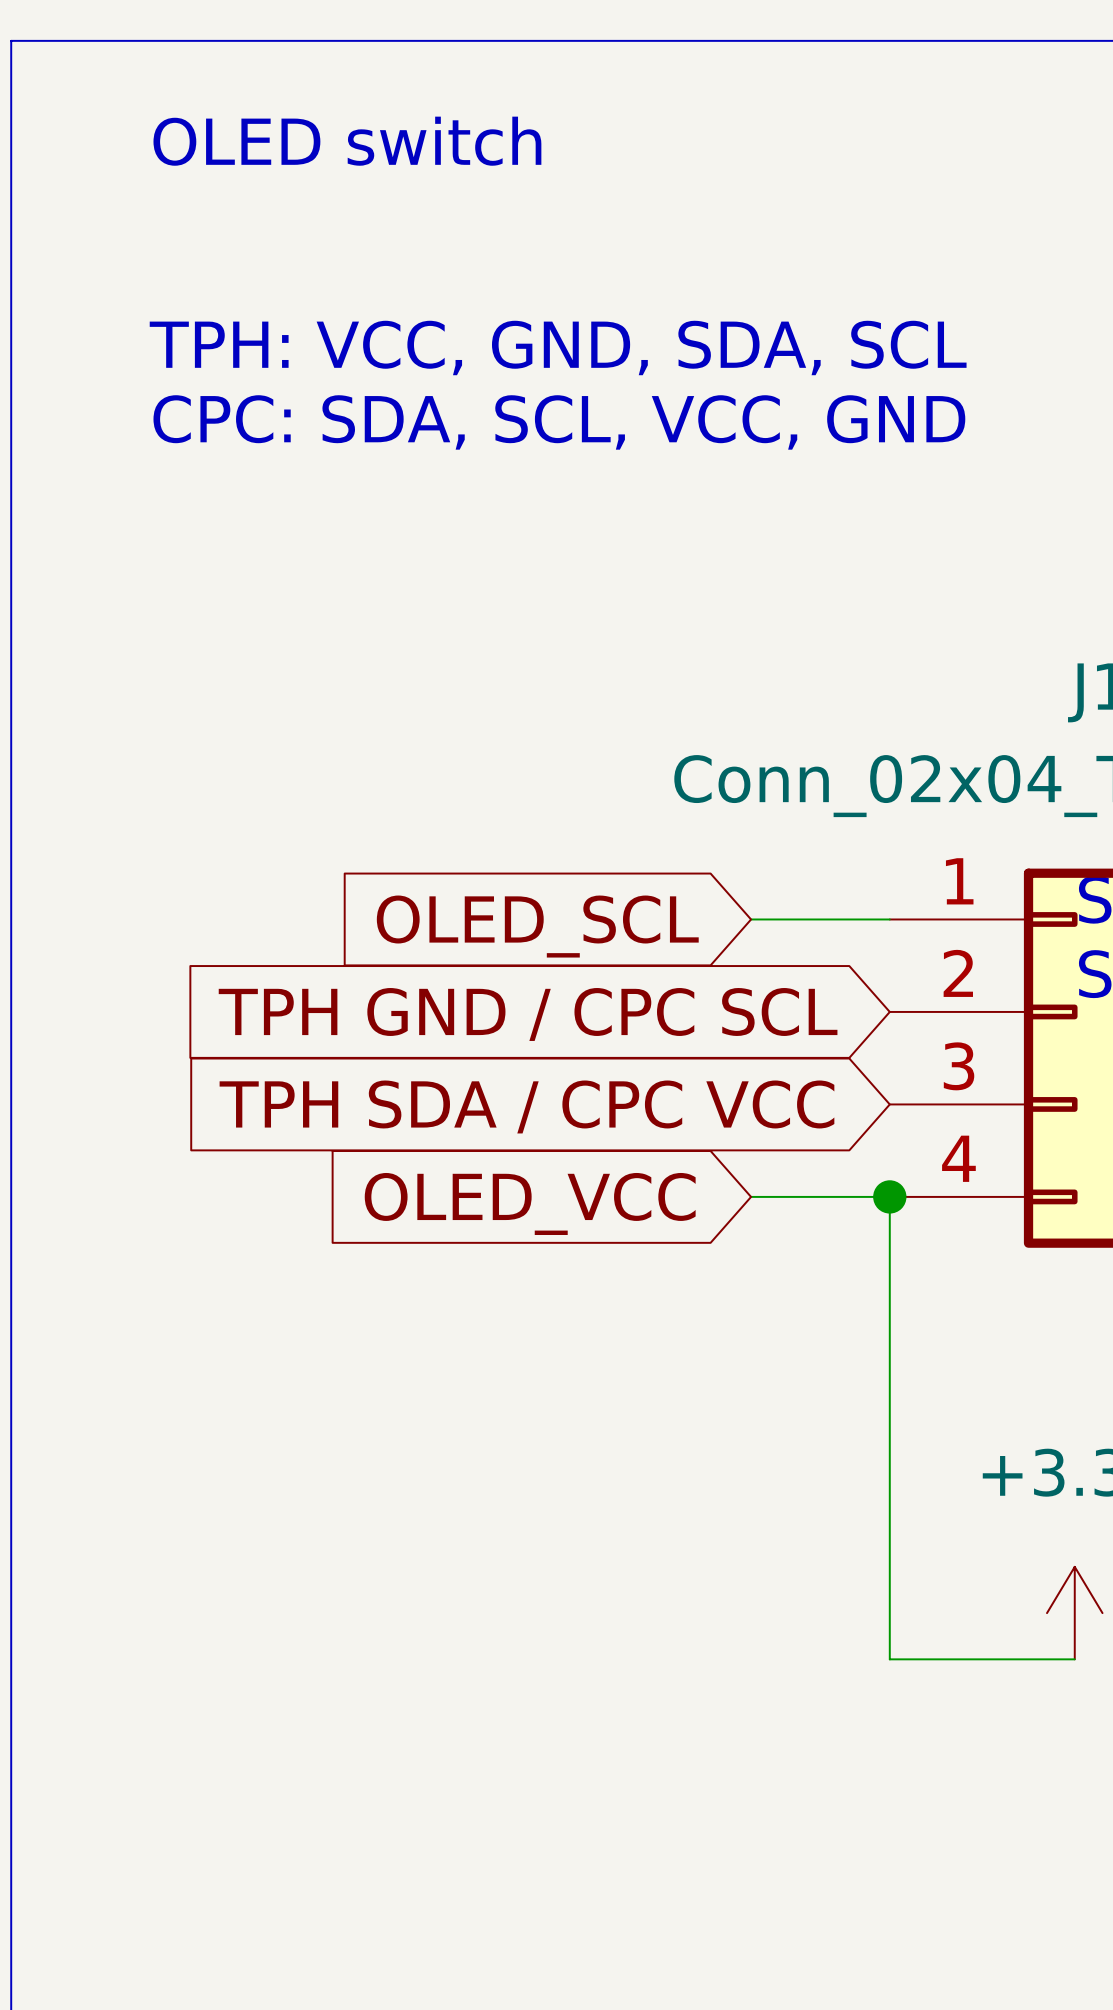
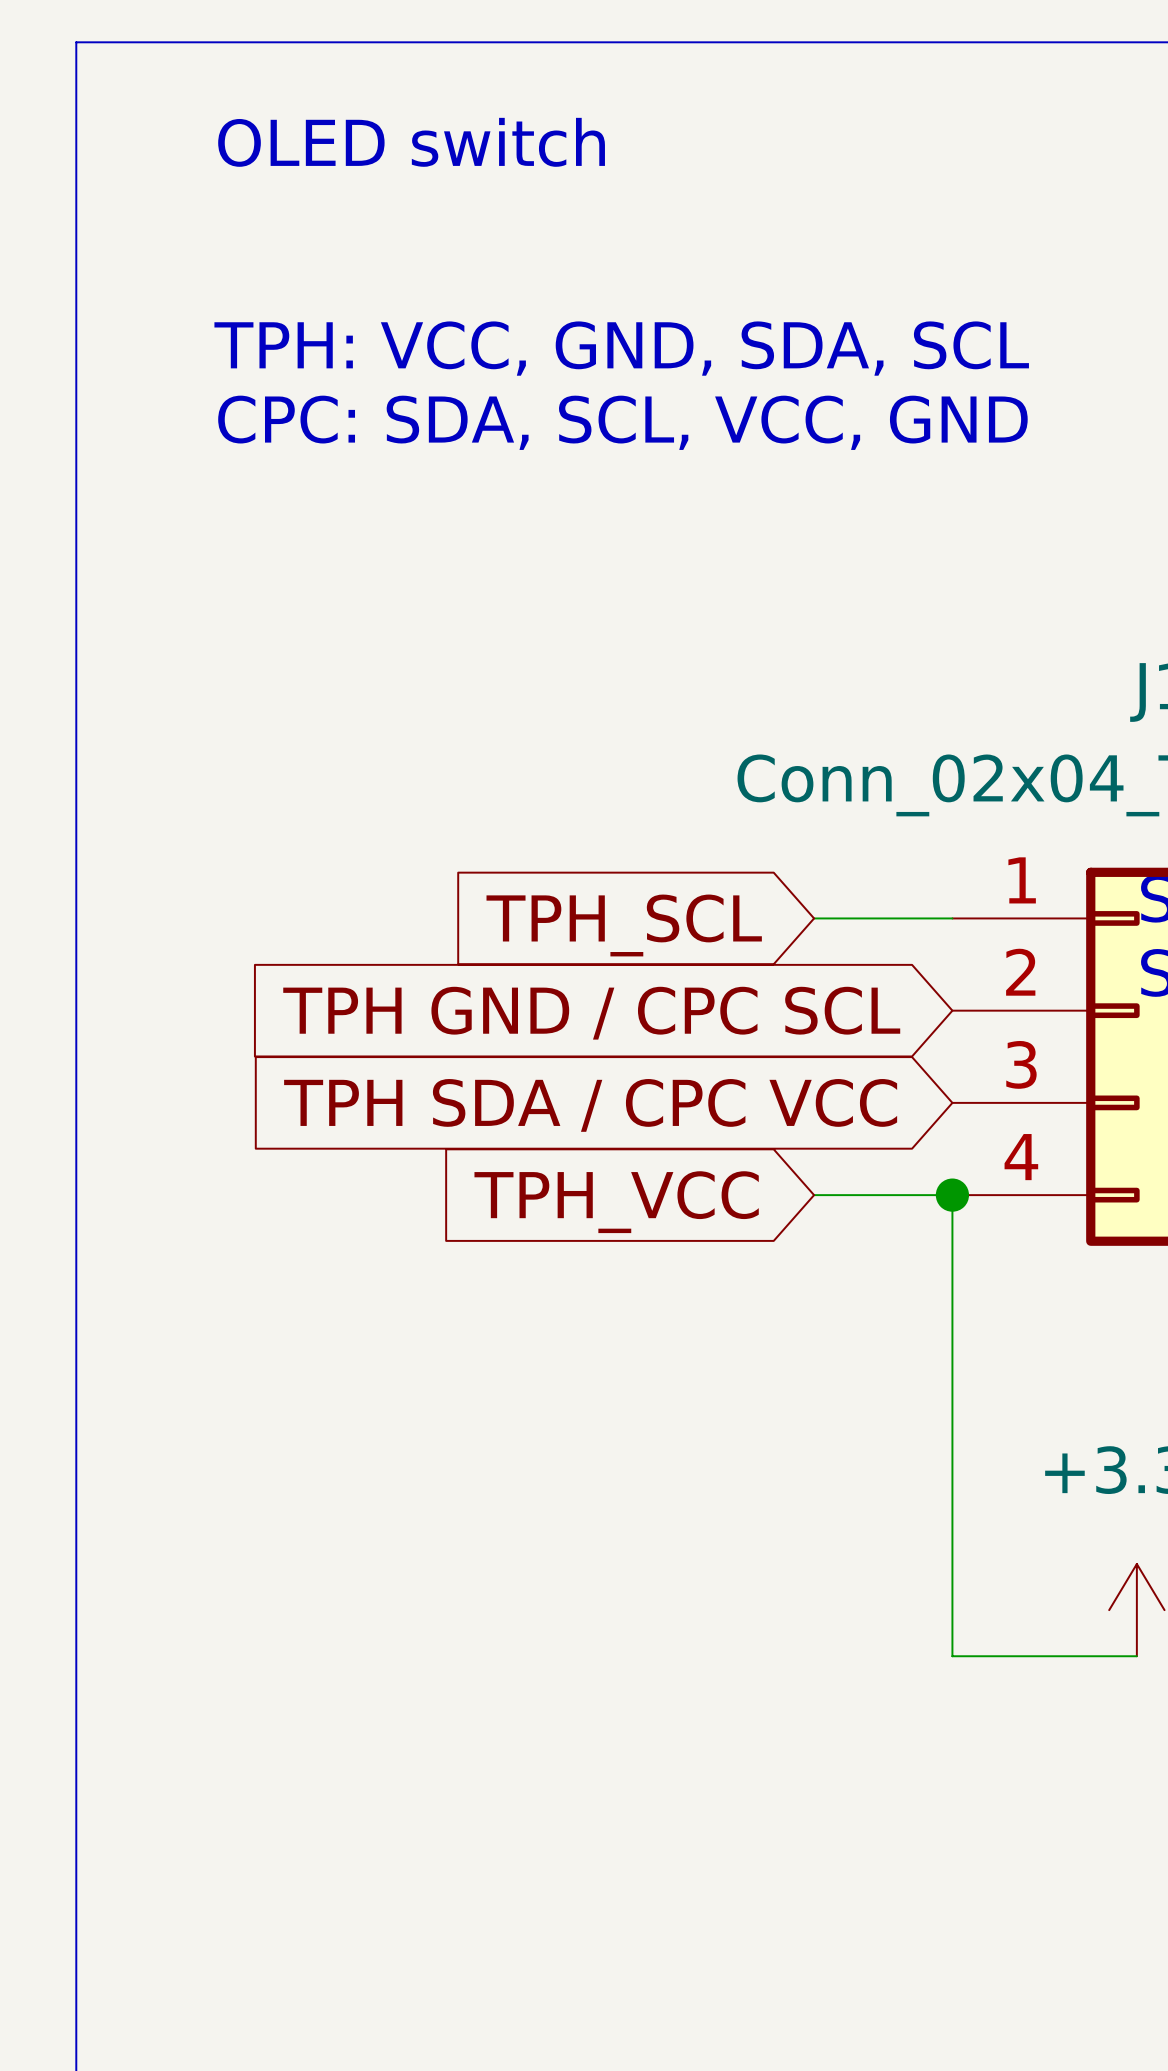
global label: OLED_SCL (537, 926) -> TPH_SCL (624, 925)
global label: OLED_VCC (530, 1203) -> TPH_VCC (616, 1202)

